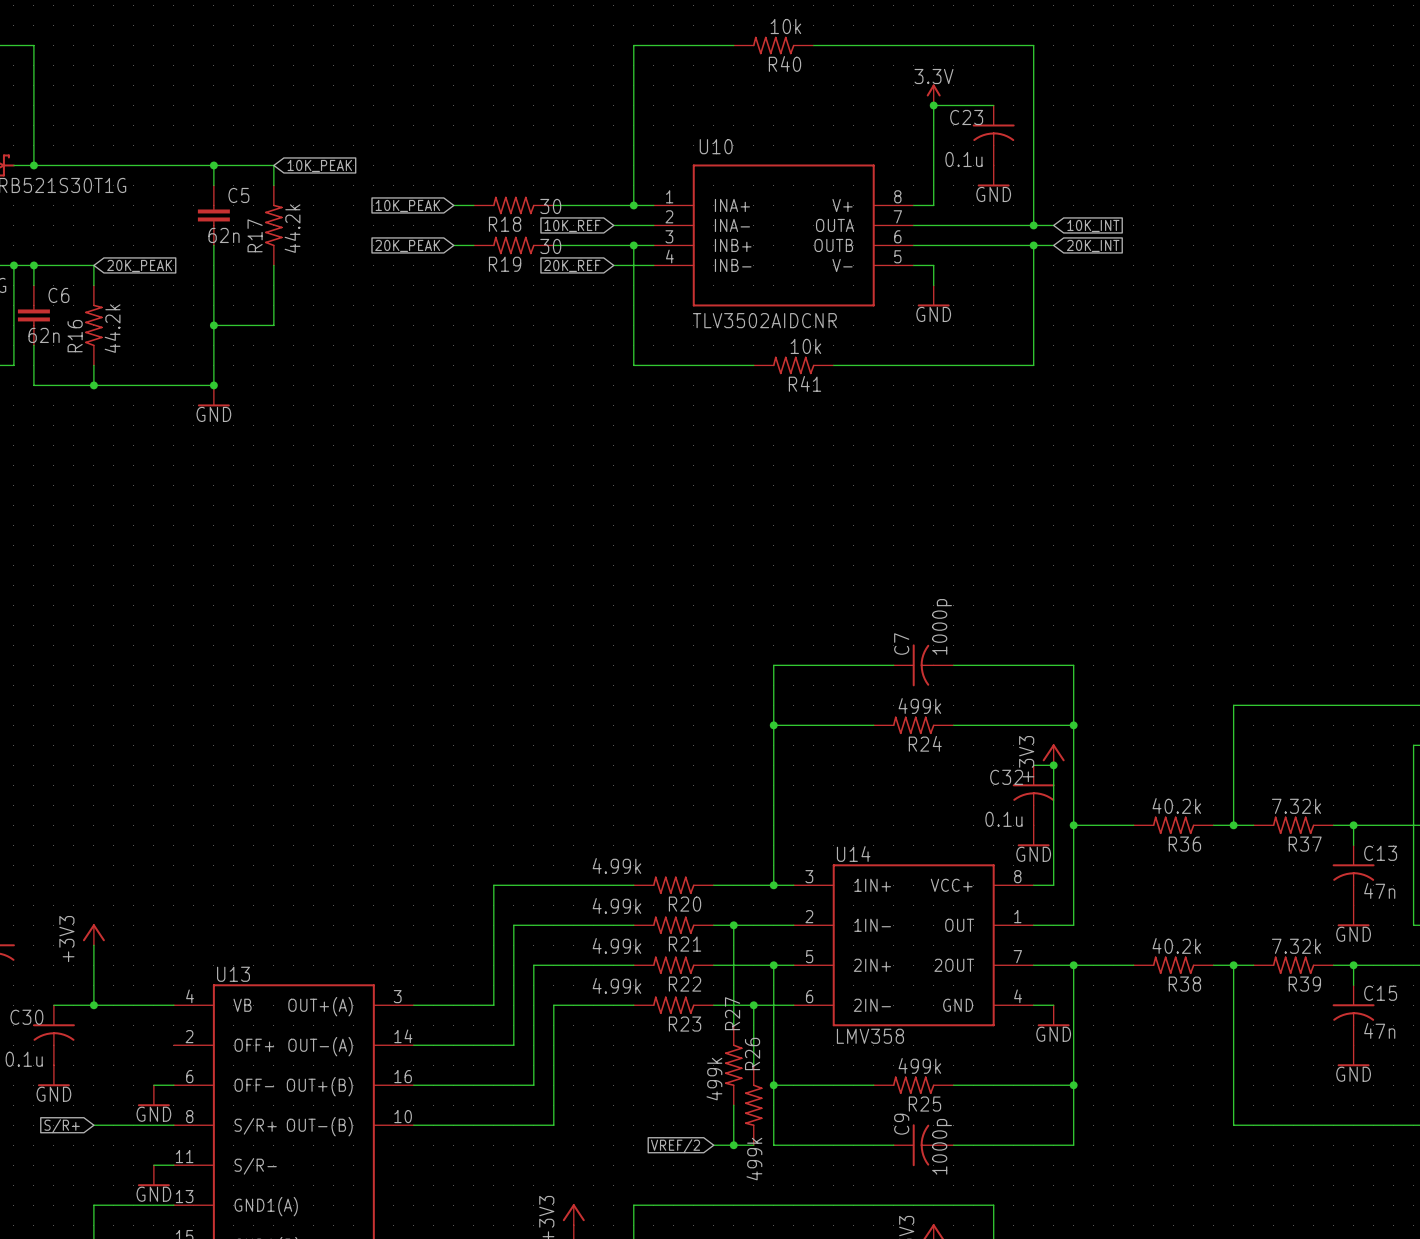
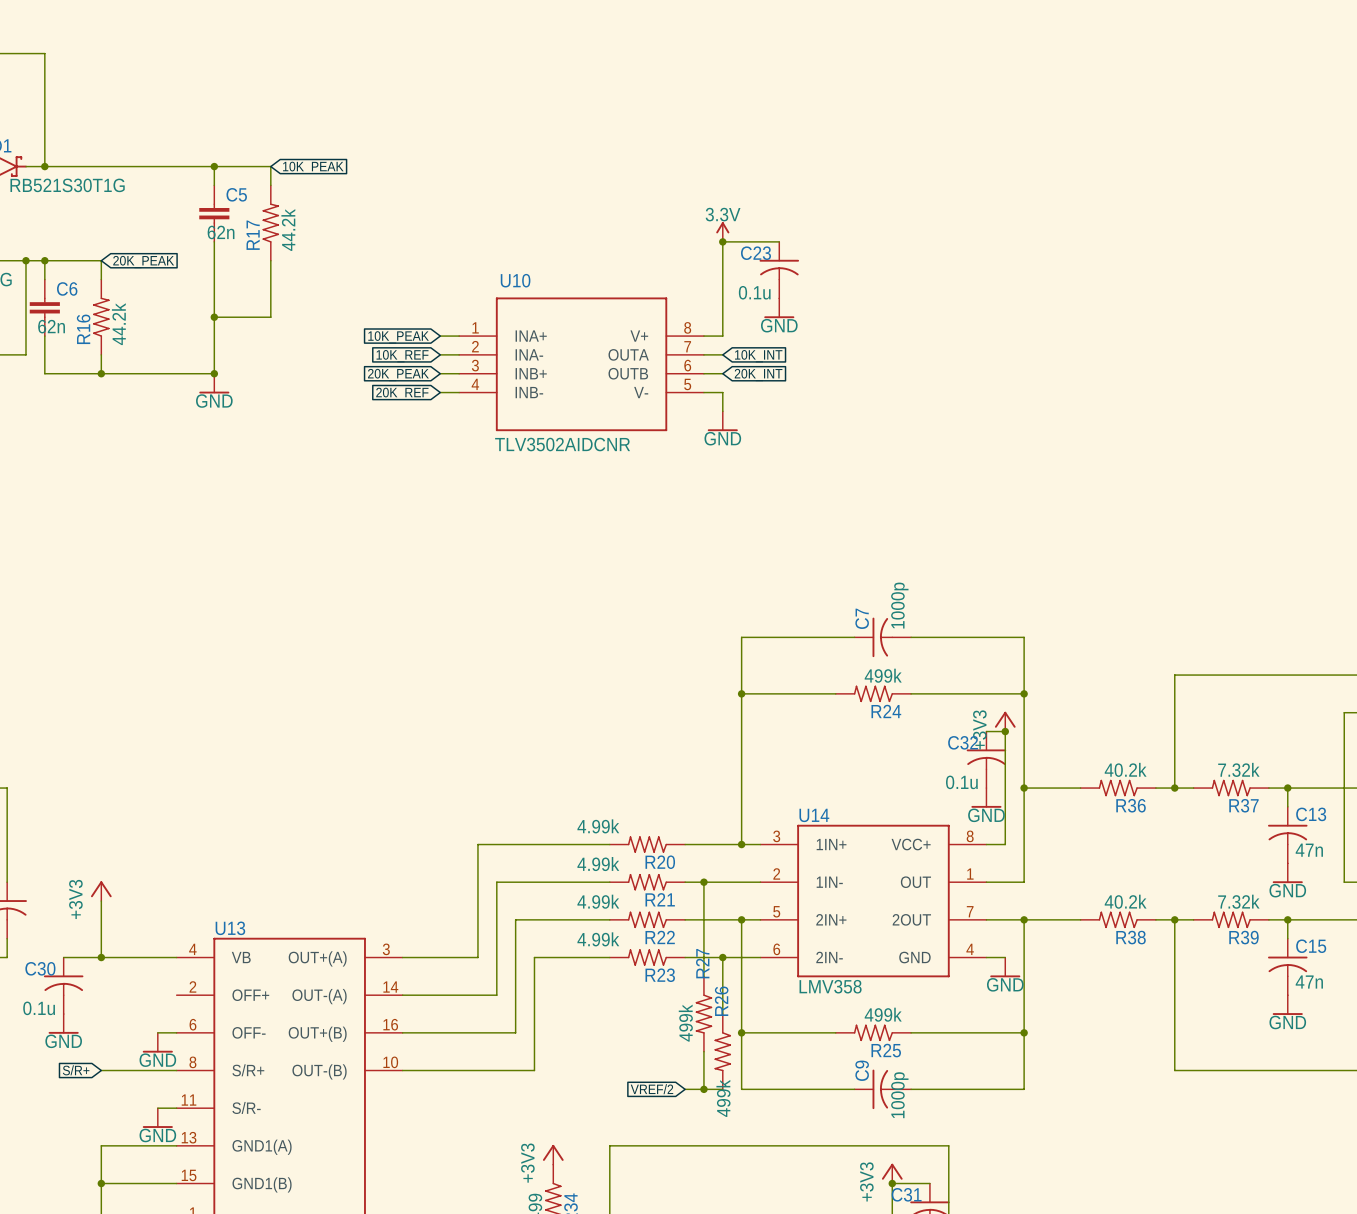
wire: (733, 45) (633, 45) (633, 205) -> none
R40: 10k (773, 45) -> none
wire: (813, 45) (1033, 45) (1033, 225) -> none
power symbol: 3.3V (933, 94) -> none
junction: (933, 105) -> none
wire: (993, 105) (933, 105) (933, 205) (913, 205) -> none
C23 position: (993, 135) -> (779, 270)
power symbol: GND (993, 175) -> none
global label position: 10K_PEAK (407, 205) -> 10K_PEAK (398, 337)
wire: (453, 205) (473, 205) -> (440, 336) (459, 336)
R18: 30 (513, 205) -> none
wire: (553, 205) (653, 205) -> none
junction: (633, 205) -> none
global label: 10K_REF (572, 225) -> none
wire: (613, 225) (653, 225) -> none
wire: (913, 225) (1053, 225) -> none
junction: (1033, 225) -> none
global label: 10K_INT (1093, 225) -> none
power symbol: none -> 3.3V (722, 232)
U10 position: (783, 235) -> (581, 364)
global label position: 20K_PEAK (407, 245) -> 20K_PEAK (398, 375)
wire: (453, 245) (473, 245) -> (440, 373) (459, 373)
R19: 30 (513, 245) -> none
wire: (553, 245) (653, 245) -> none
wire: (633, 245) (633, 365) (733, 365) -> none
junction: (633, 245) -> none
junction: none -> (722, 241)
wire: none -> (779, 241) (722, 241) (722, 336) (703, 336)
wire: (913, 245) (1053, 245) -> none
wire: (1033, 245) (1033, 365) (833, 365) -> none
junction: (1033, 245) -> none
global label: 20K_INT (1093, 245) -> none
global label: 20K_REF (572, 265) -> none
wire: (613, 265) (653, 265) -> none
wire: (913, 265) (933, 265) (933, 285) -> none
power symbol: GND (933, 295) -> none
power symbol: none -> GND (779, 308)
global label: none -> 10K_REF (402, 356)
wire: none -> (440, 354) (459, 354)
R41: 10k (793, 365) -> none
global label: none -> 10K_INT (758, 356)
wire: none -> (703, 373) (722, 373)
global label: none -> 20K_INT (758, 375)
global label: none -> 20K_REF (402, 393)
wire: none -> (440, 392) (459, 392)
wire: none -> (703, 392) (722, 392) (722, 411)
power symbol: none -> GND (722, 421)

